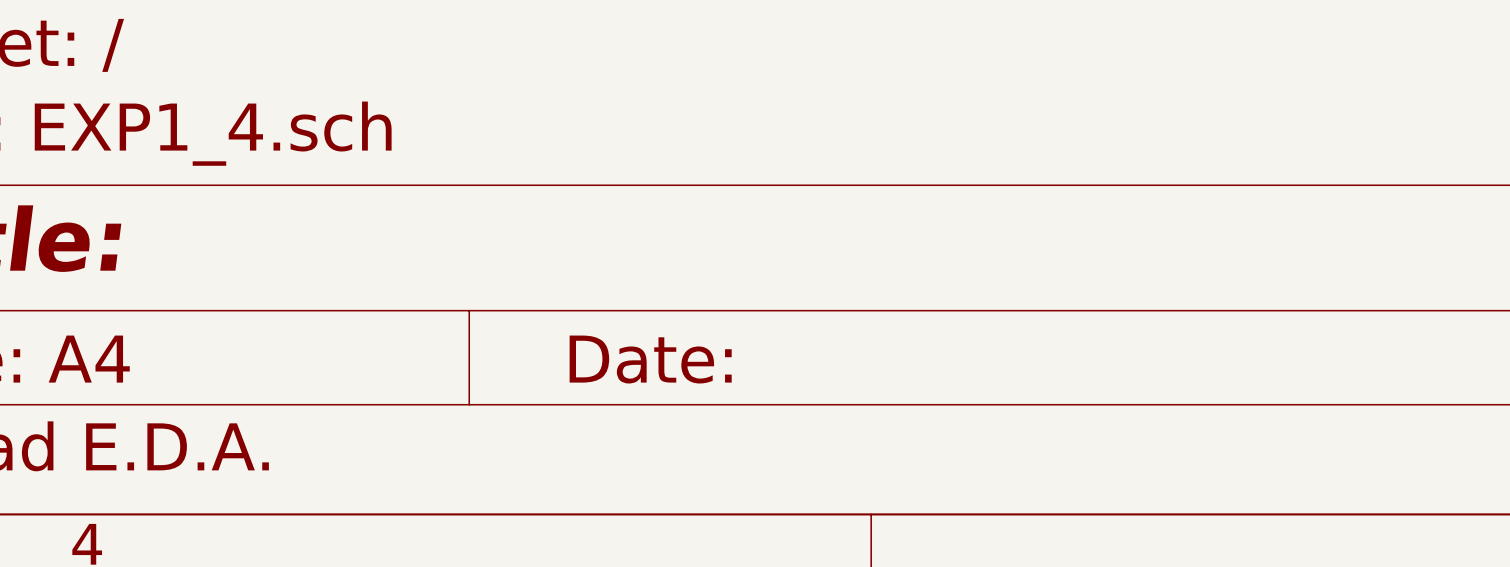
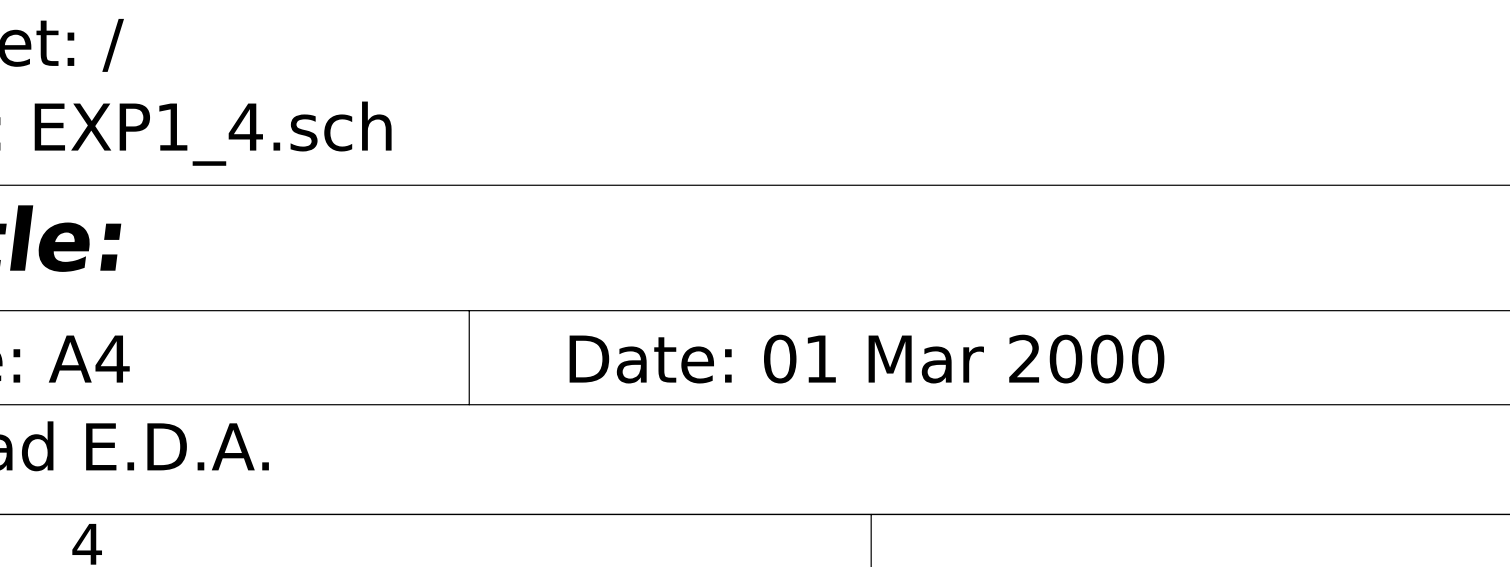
title block: Date: (650, 359) -> Date: 01 Mar 2000 (867, 359)

